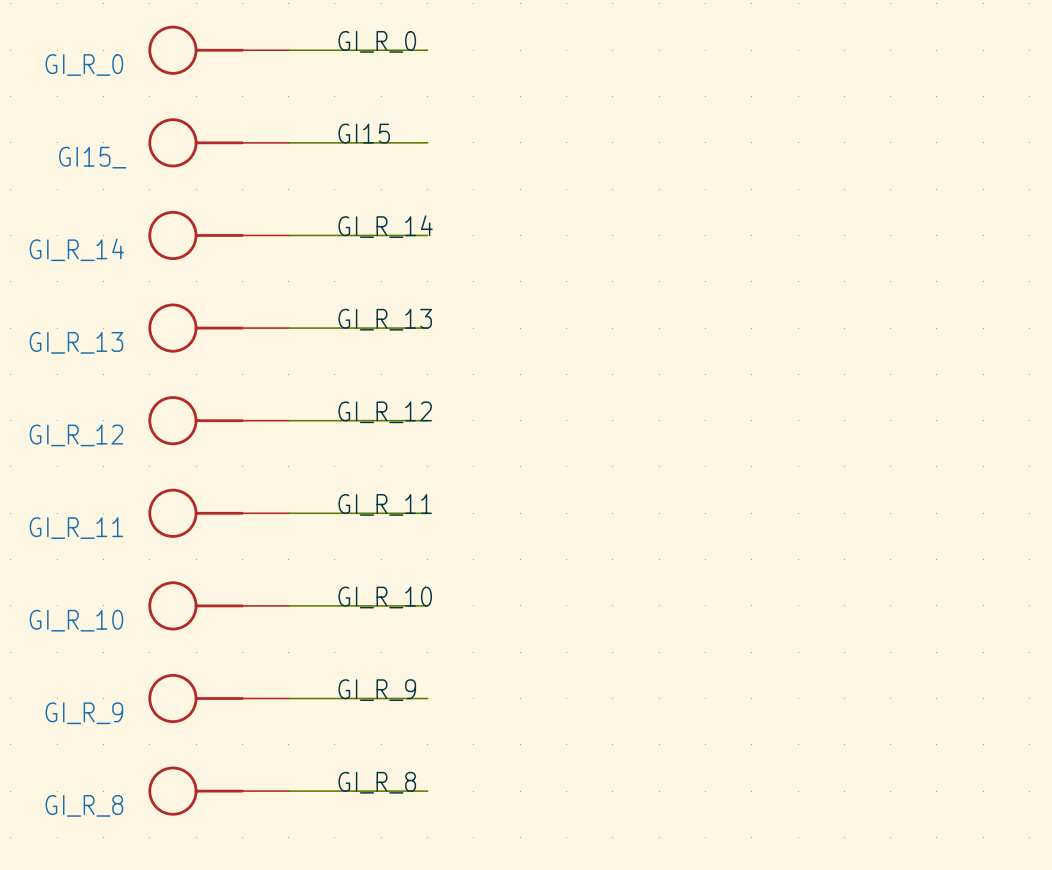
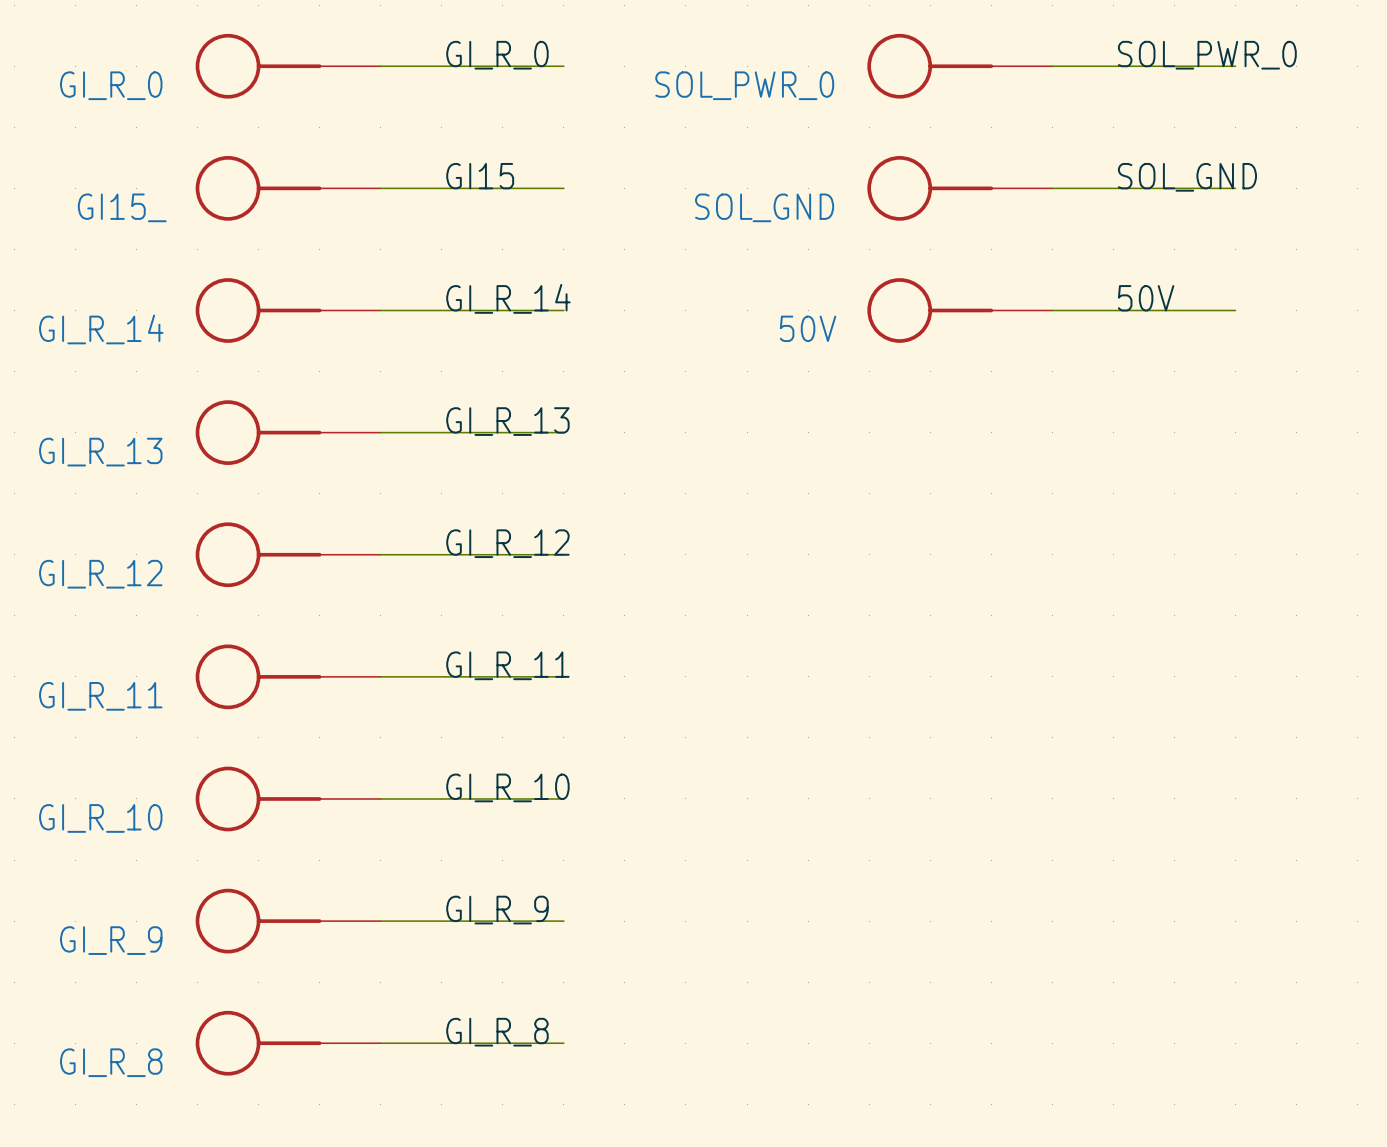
label: none -> SOL_PWR_0 (1207, 55)
SOL_PWR_0: none -> (959, 66)
wire: none -> (1052, 66) (1235, 66)
label: none -> SOL_GND (1187, 177)
SOL_GND: none -> (959, 188)
wire: none -> (1052, 188) (1235, 188)
label: none -> 50V (1146, 298)
50V: none -> (959, 310)
wire: none -> (1052, 310) (1235, 310)

